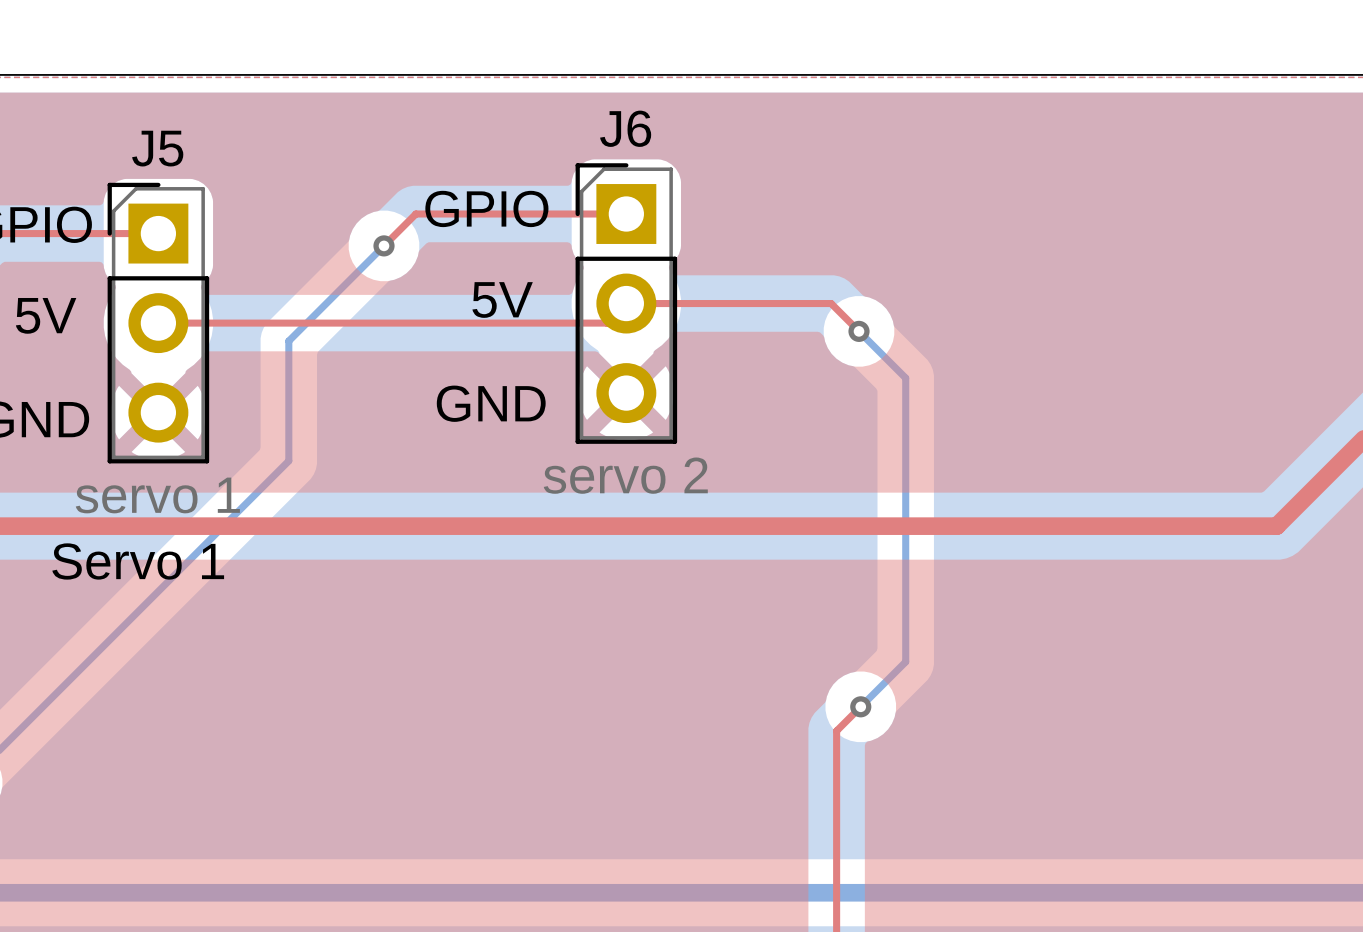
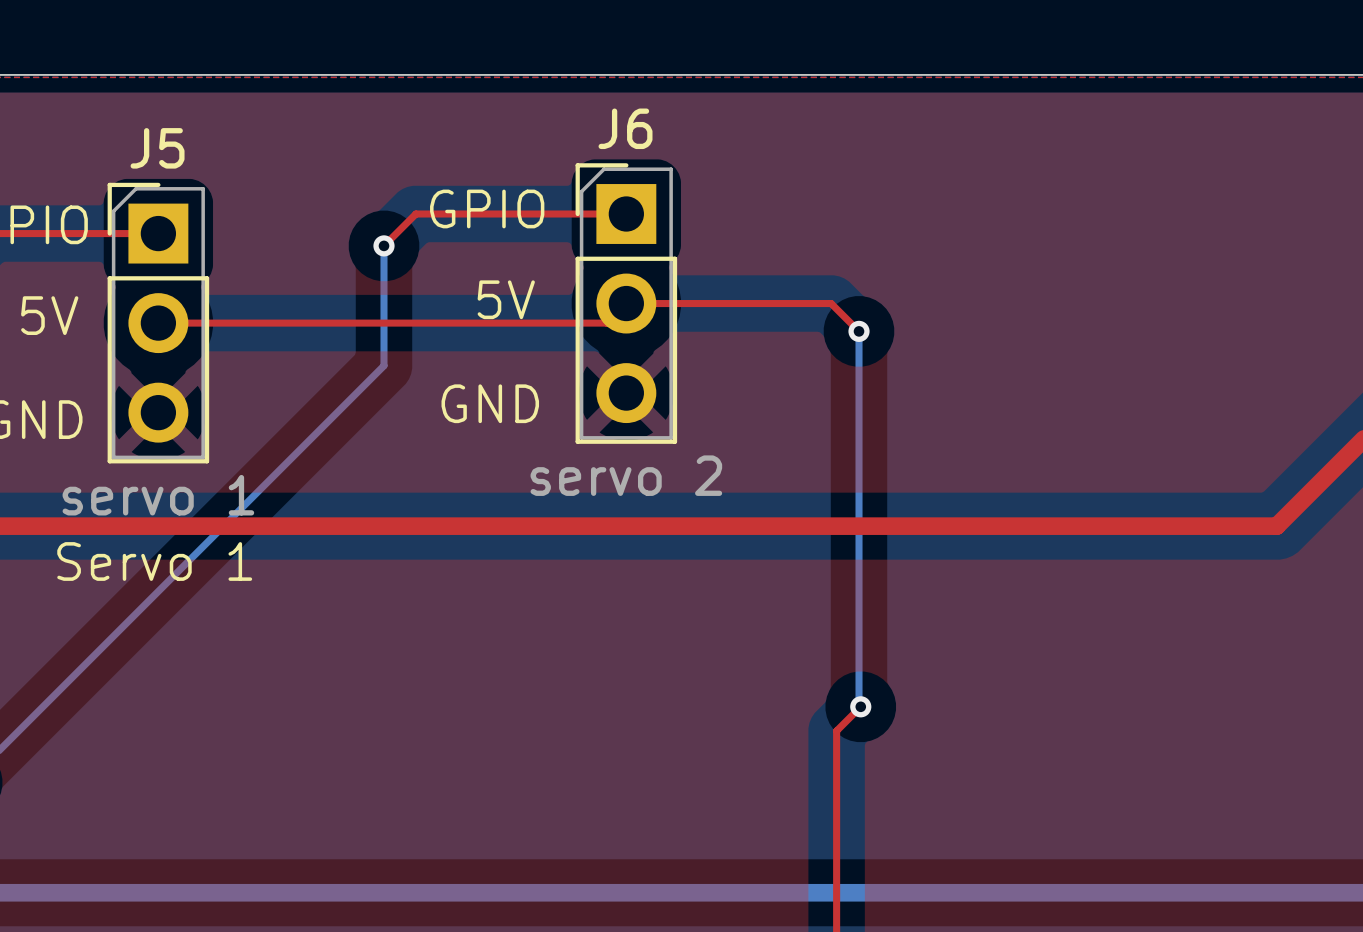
bottom track: (383, 245) (288, 341) (288, 460) -> (383, 245) (383, 365) (288, 460)
bottom track: (859, 331) (905, 378) (905, 661) (860, 706) -> (859, 331) (859, 705) (860, 706)

